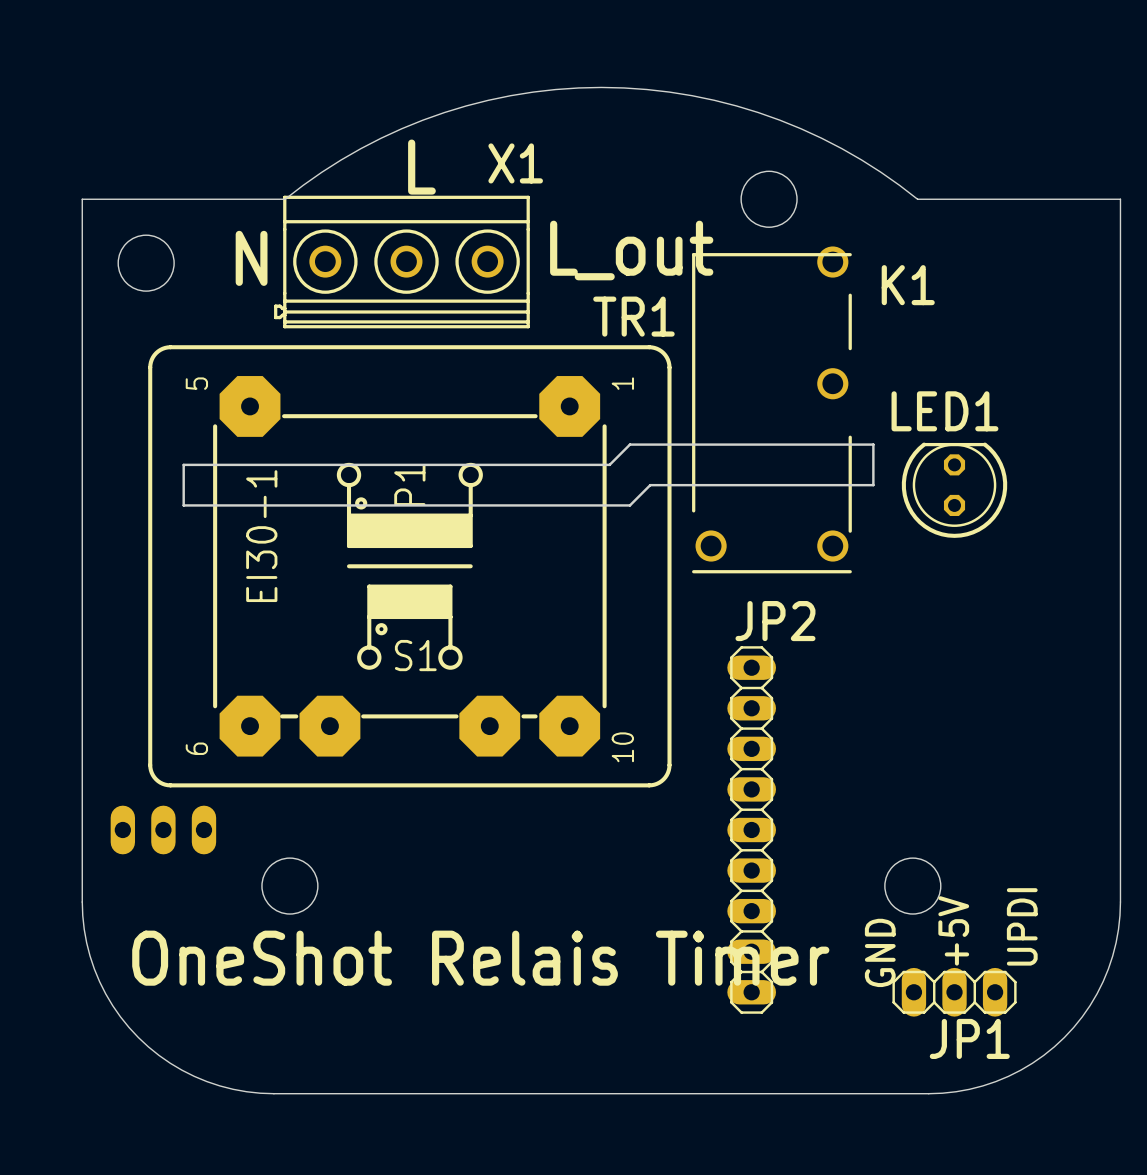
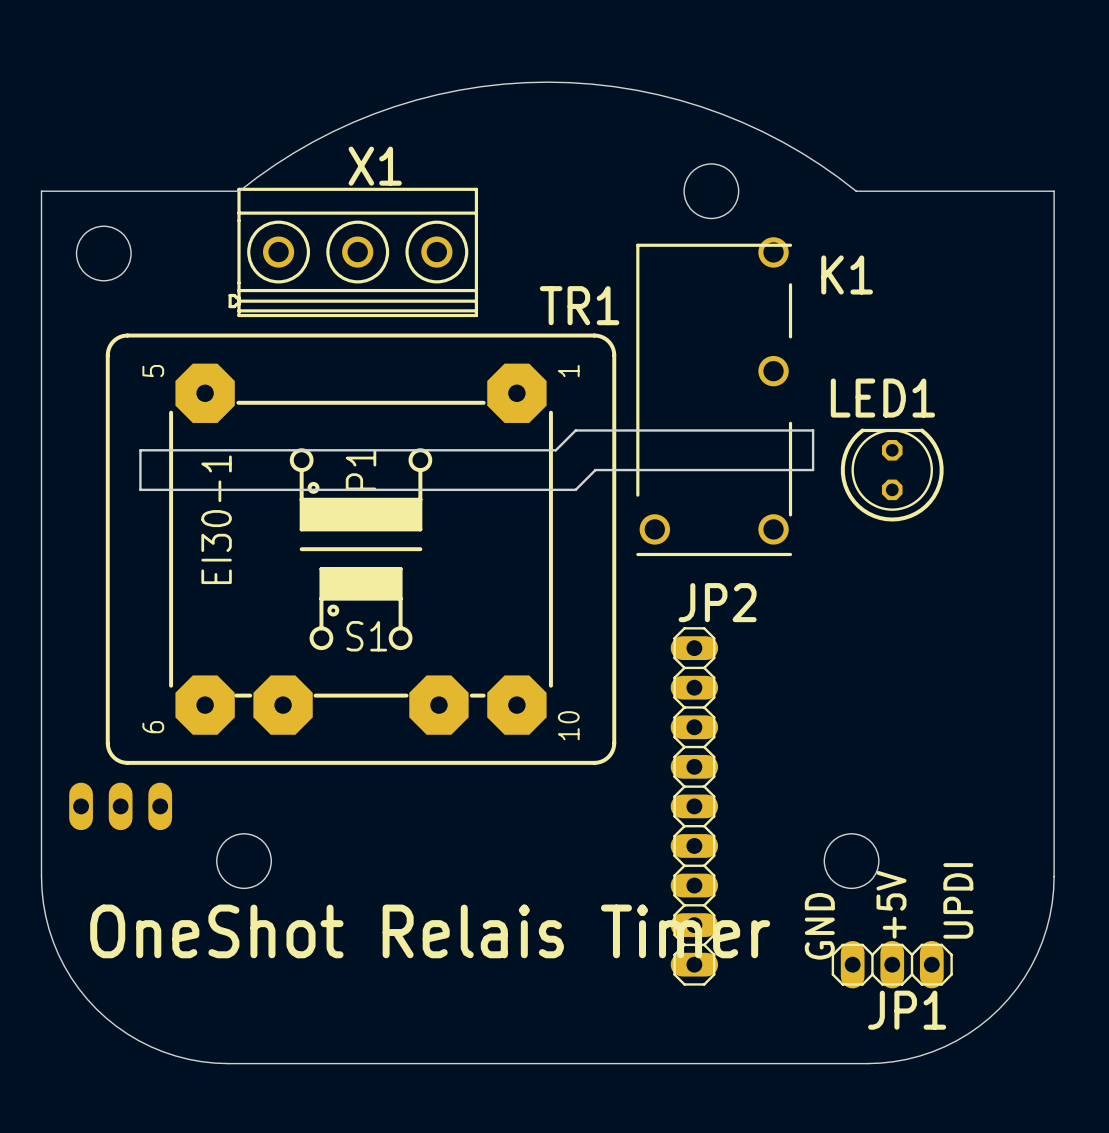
X1 name position: X1 (515, 163) -> X1 (375, 166)
text: L (421, 167) -> none
text: L_out (631, 250) -> none
text: N (251, 258) -> none

